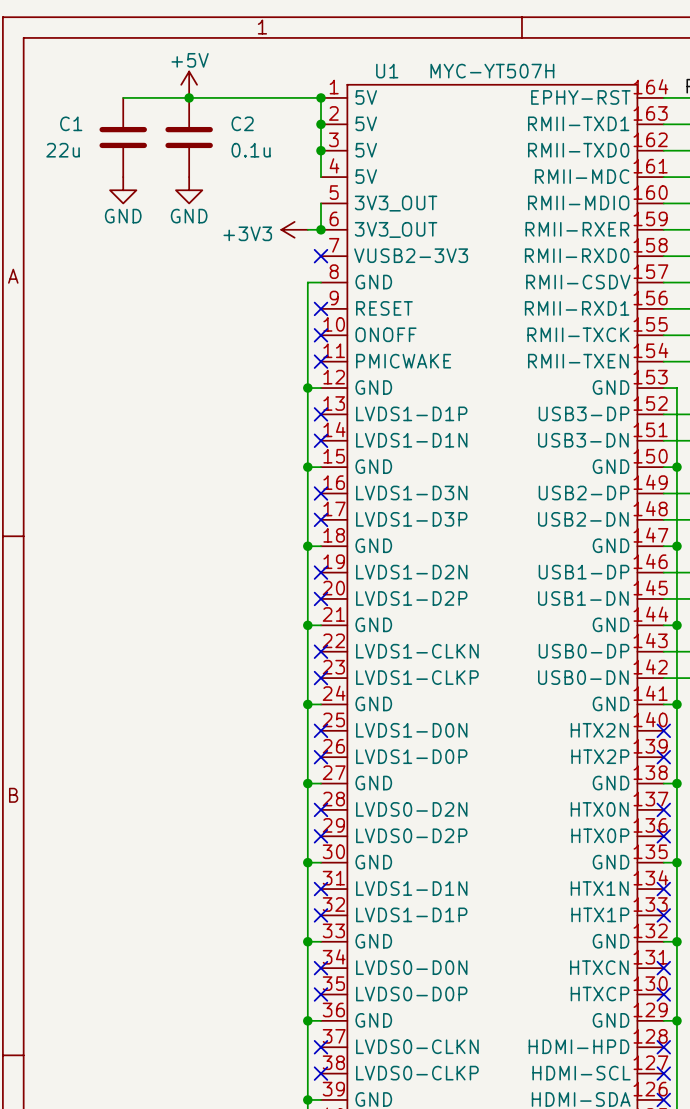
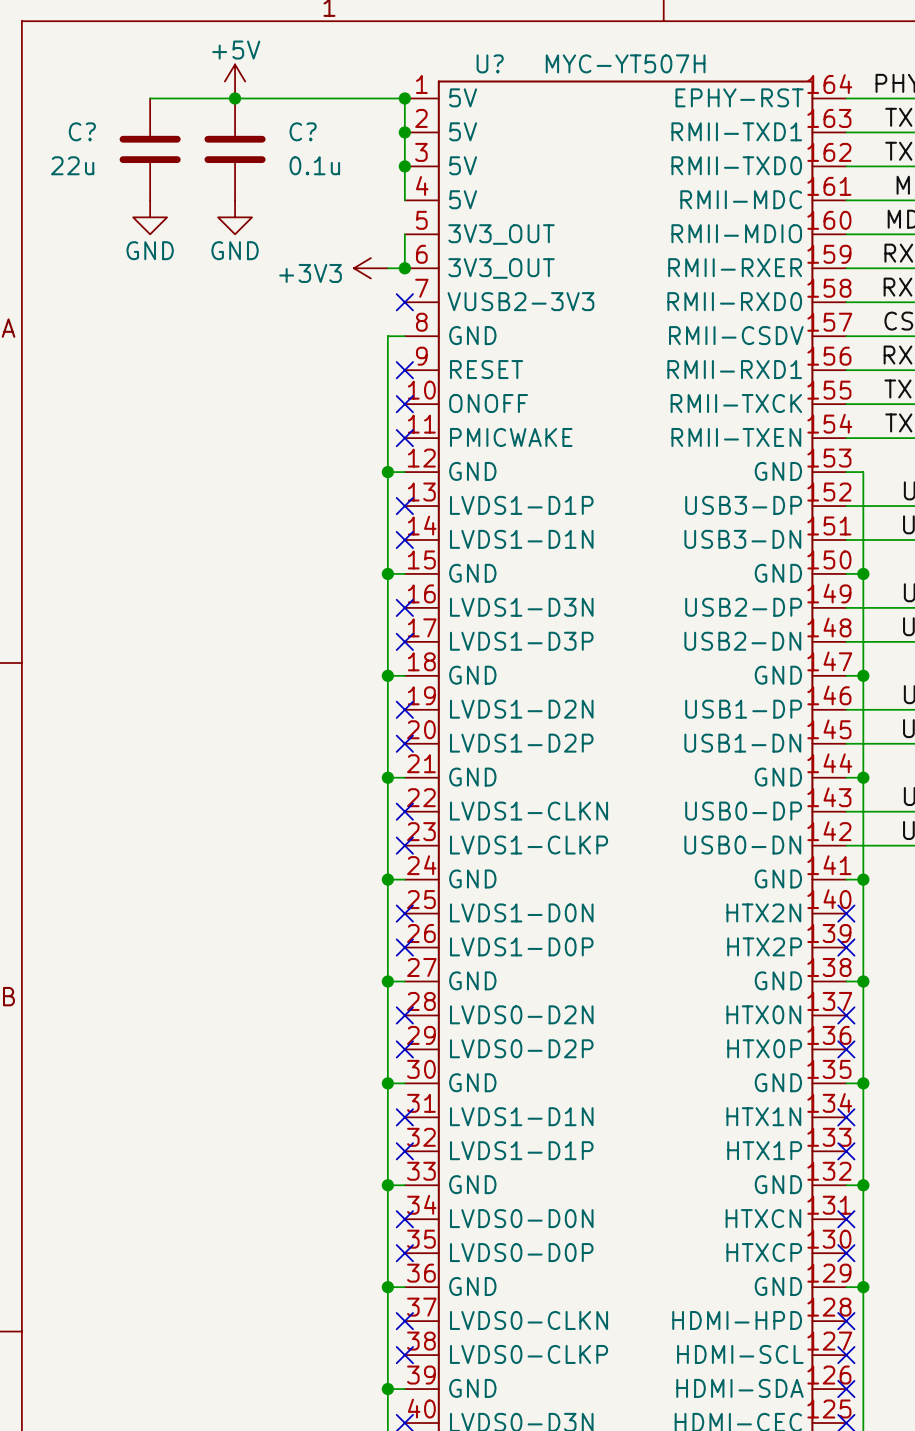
U1 name: U1 (387, 71) -> U? (490, 63)
C1 name: C1 (71, 123) -> C? (82, 131)
C2 name: C2 (242, 123) -> C? (303, 131)

